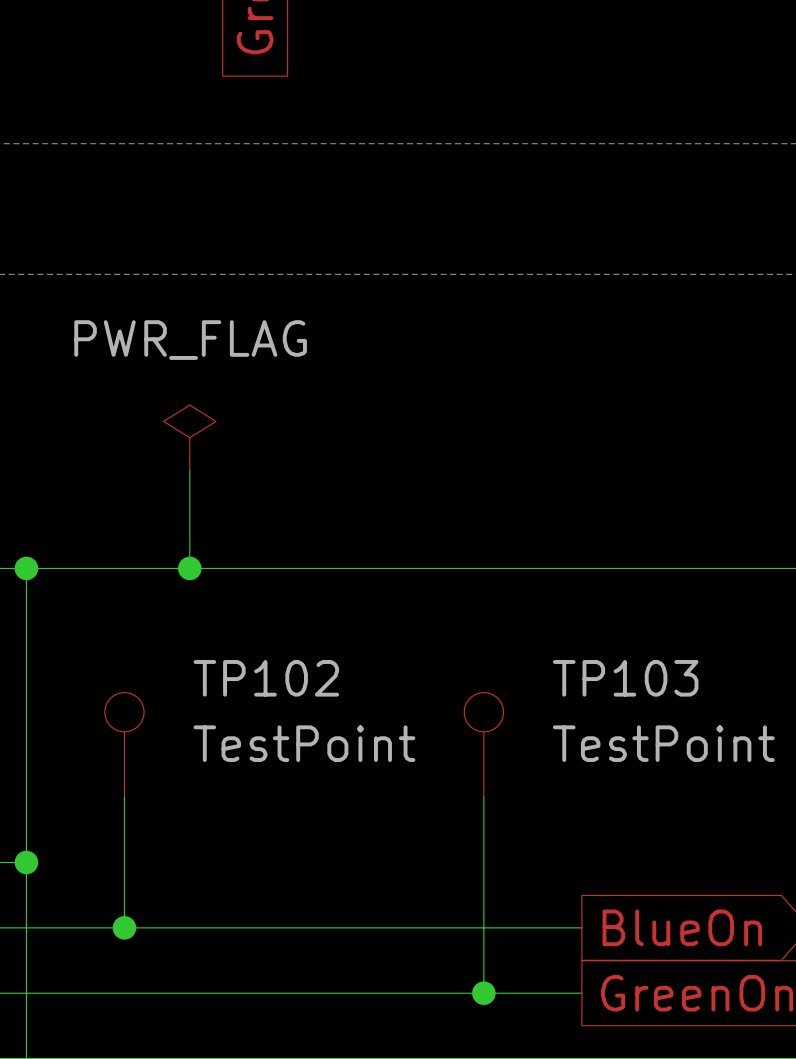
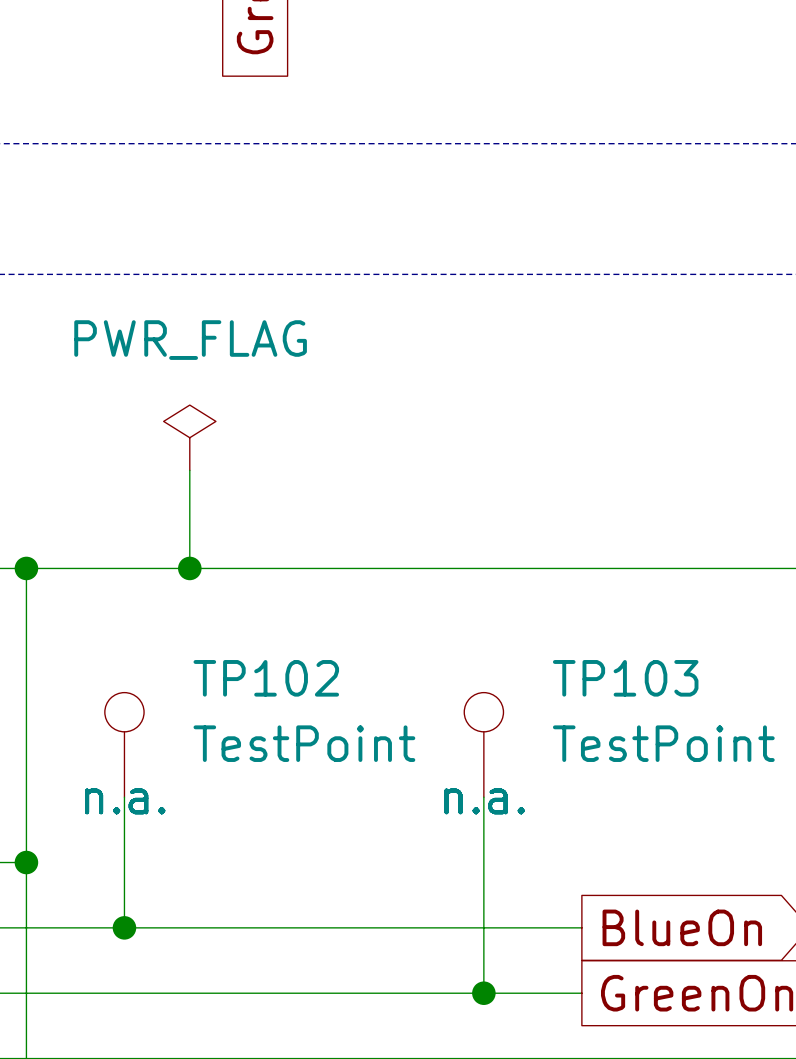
TP102 text: none -> n.a. (125, 801)
TP102 text: none -> n.a. (125, 801)
TP102 text: none -> n.a. (125, 801)
TP103 text: none -> n.a. (484, 801)
TP103 text: none -> n.a. (484, 801)
TP103 text: none -> n.a. (484, 801)

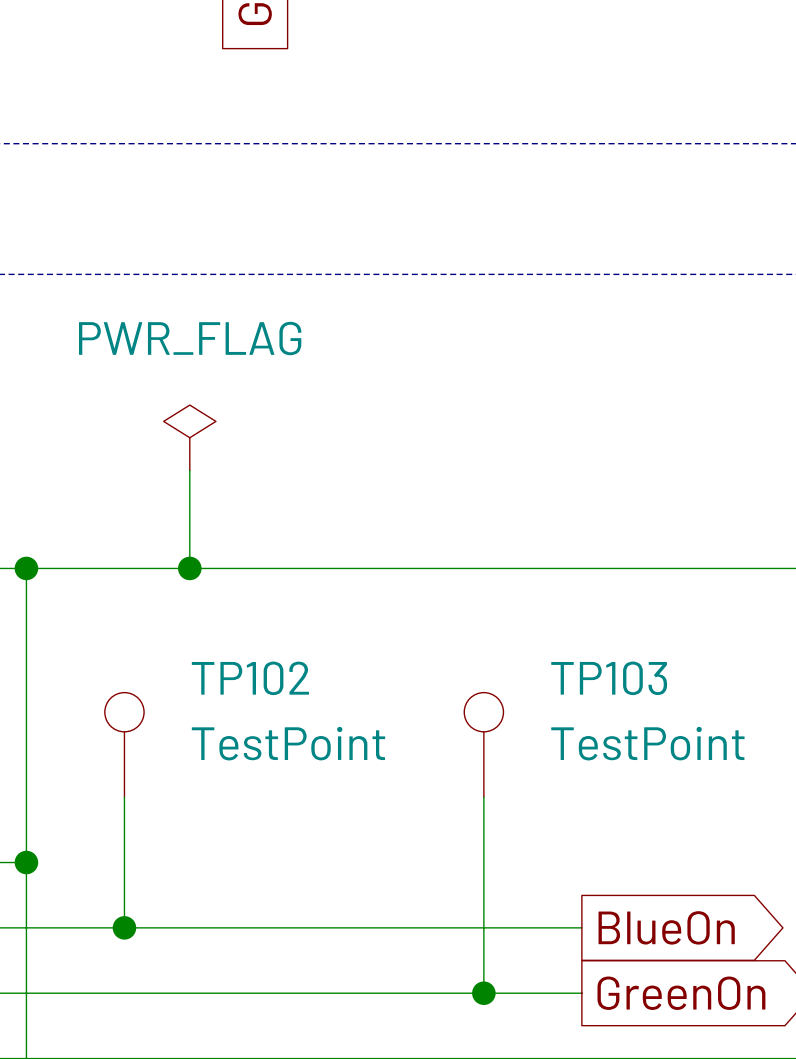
TP102 text: n.a. (125, 801) -> none
TP102 text: n.a. (125, 801) -> none
TP102 text: n.a. (125, 801) -> none
TP103 text: n.a. (484, 801) -> none
TP103 text: n.a. (484, 801) -> none
TP103 text: n.a. (484, 801) -> none

